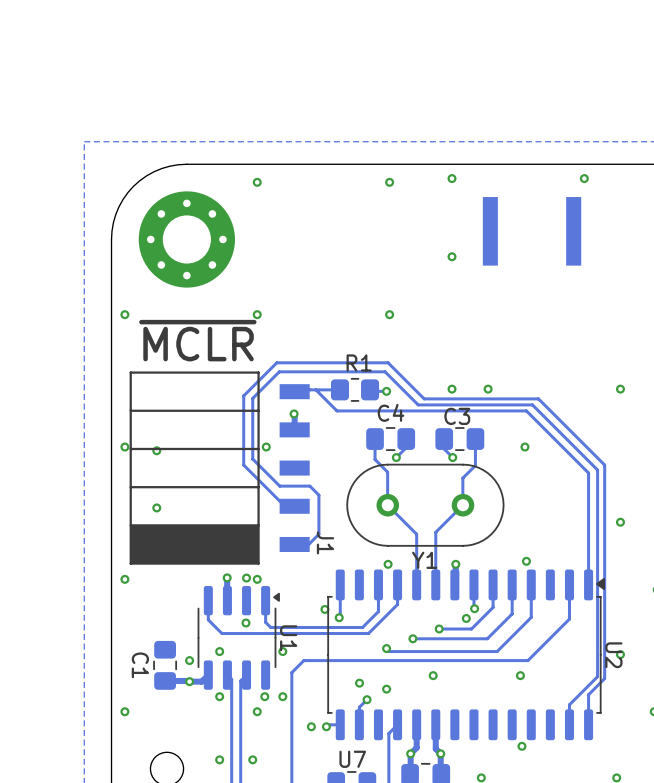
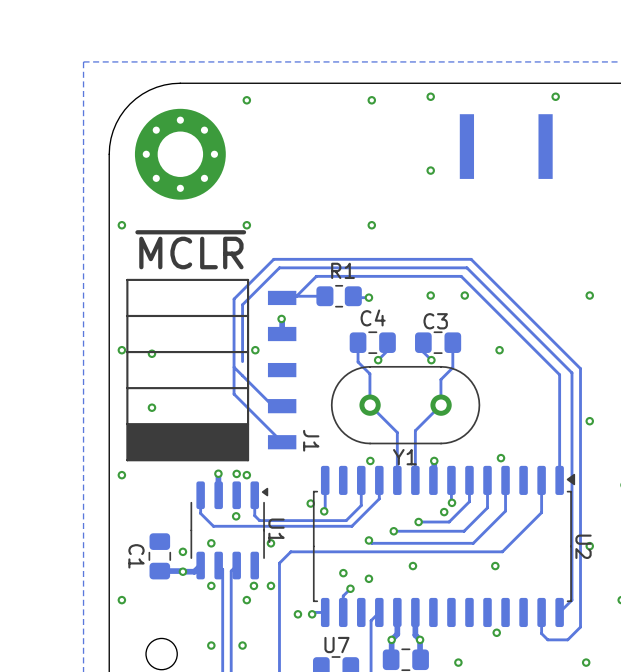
track: (315, 389) (336, 410) (526, 410) -> (296, 296) (316, 276) (461, 276) (500, 316)
track: (243, 395) (276, 362) (388, 362) (424, 398) (538, 398) (604, 465) (604, 678) (588, 694) (588, 724) -> (242, 304) (279, 267) (466, 267) (571, 372) (571, 600) (559, 612)
track: (252, 398) (279, 371) (385, 371) (418, 404) (532, 404) (597, 470) (597, 676) (569, 704) (569, 724) -> (234, 301) (234, 299) (273, 259) (471, 259) (580, 368) (580, 627) (567, 639) (547, 639) (541, 633) (541, 612)
track: (252, 459) (279, 486) (309, 486) (318, 495) (318, 534) (308, 544) (294, 544) -> (234, 367) (234, 394) (282, 442)

